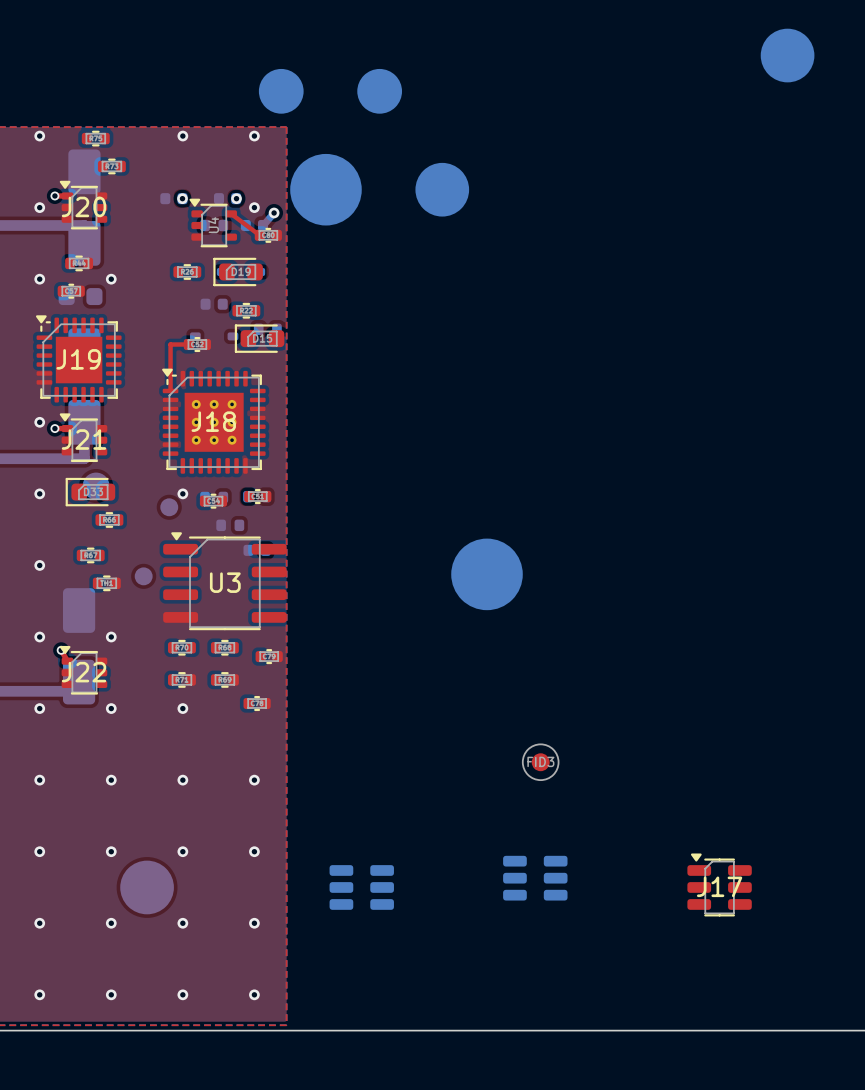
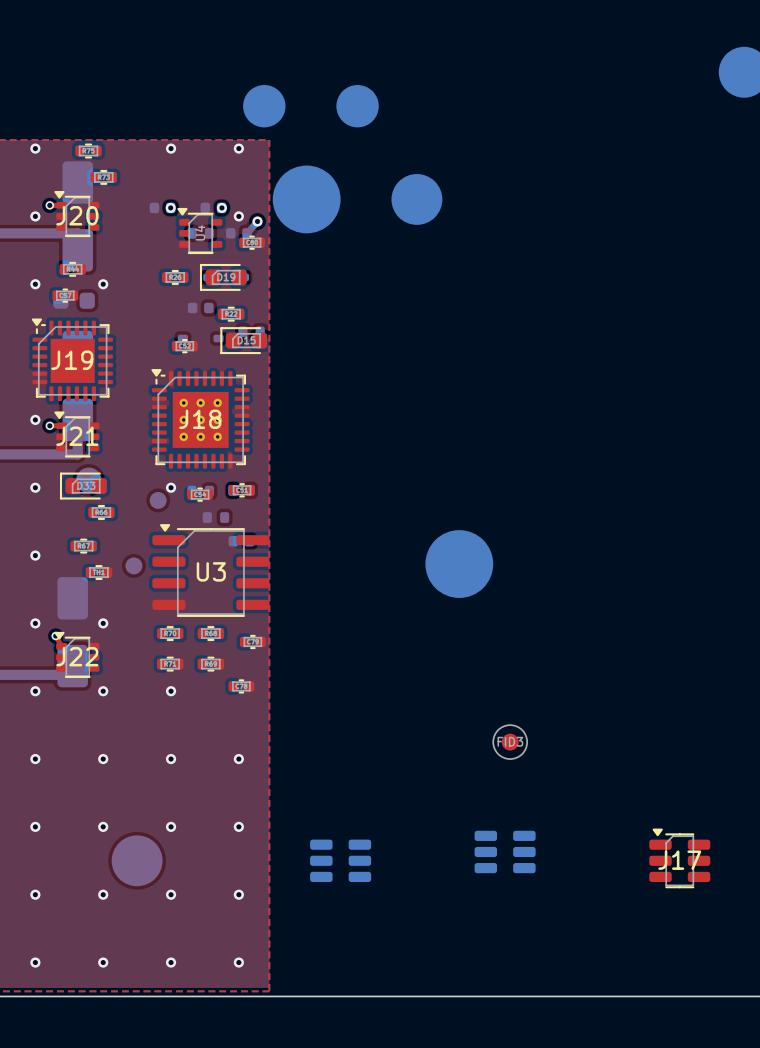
top track: (231, 213) (259, 235) -> none
top track: (188, 344) (170, 344) (170, 390) -> none

